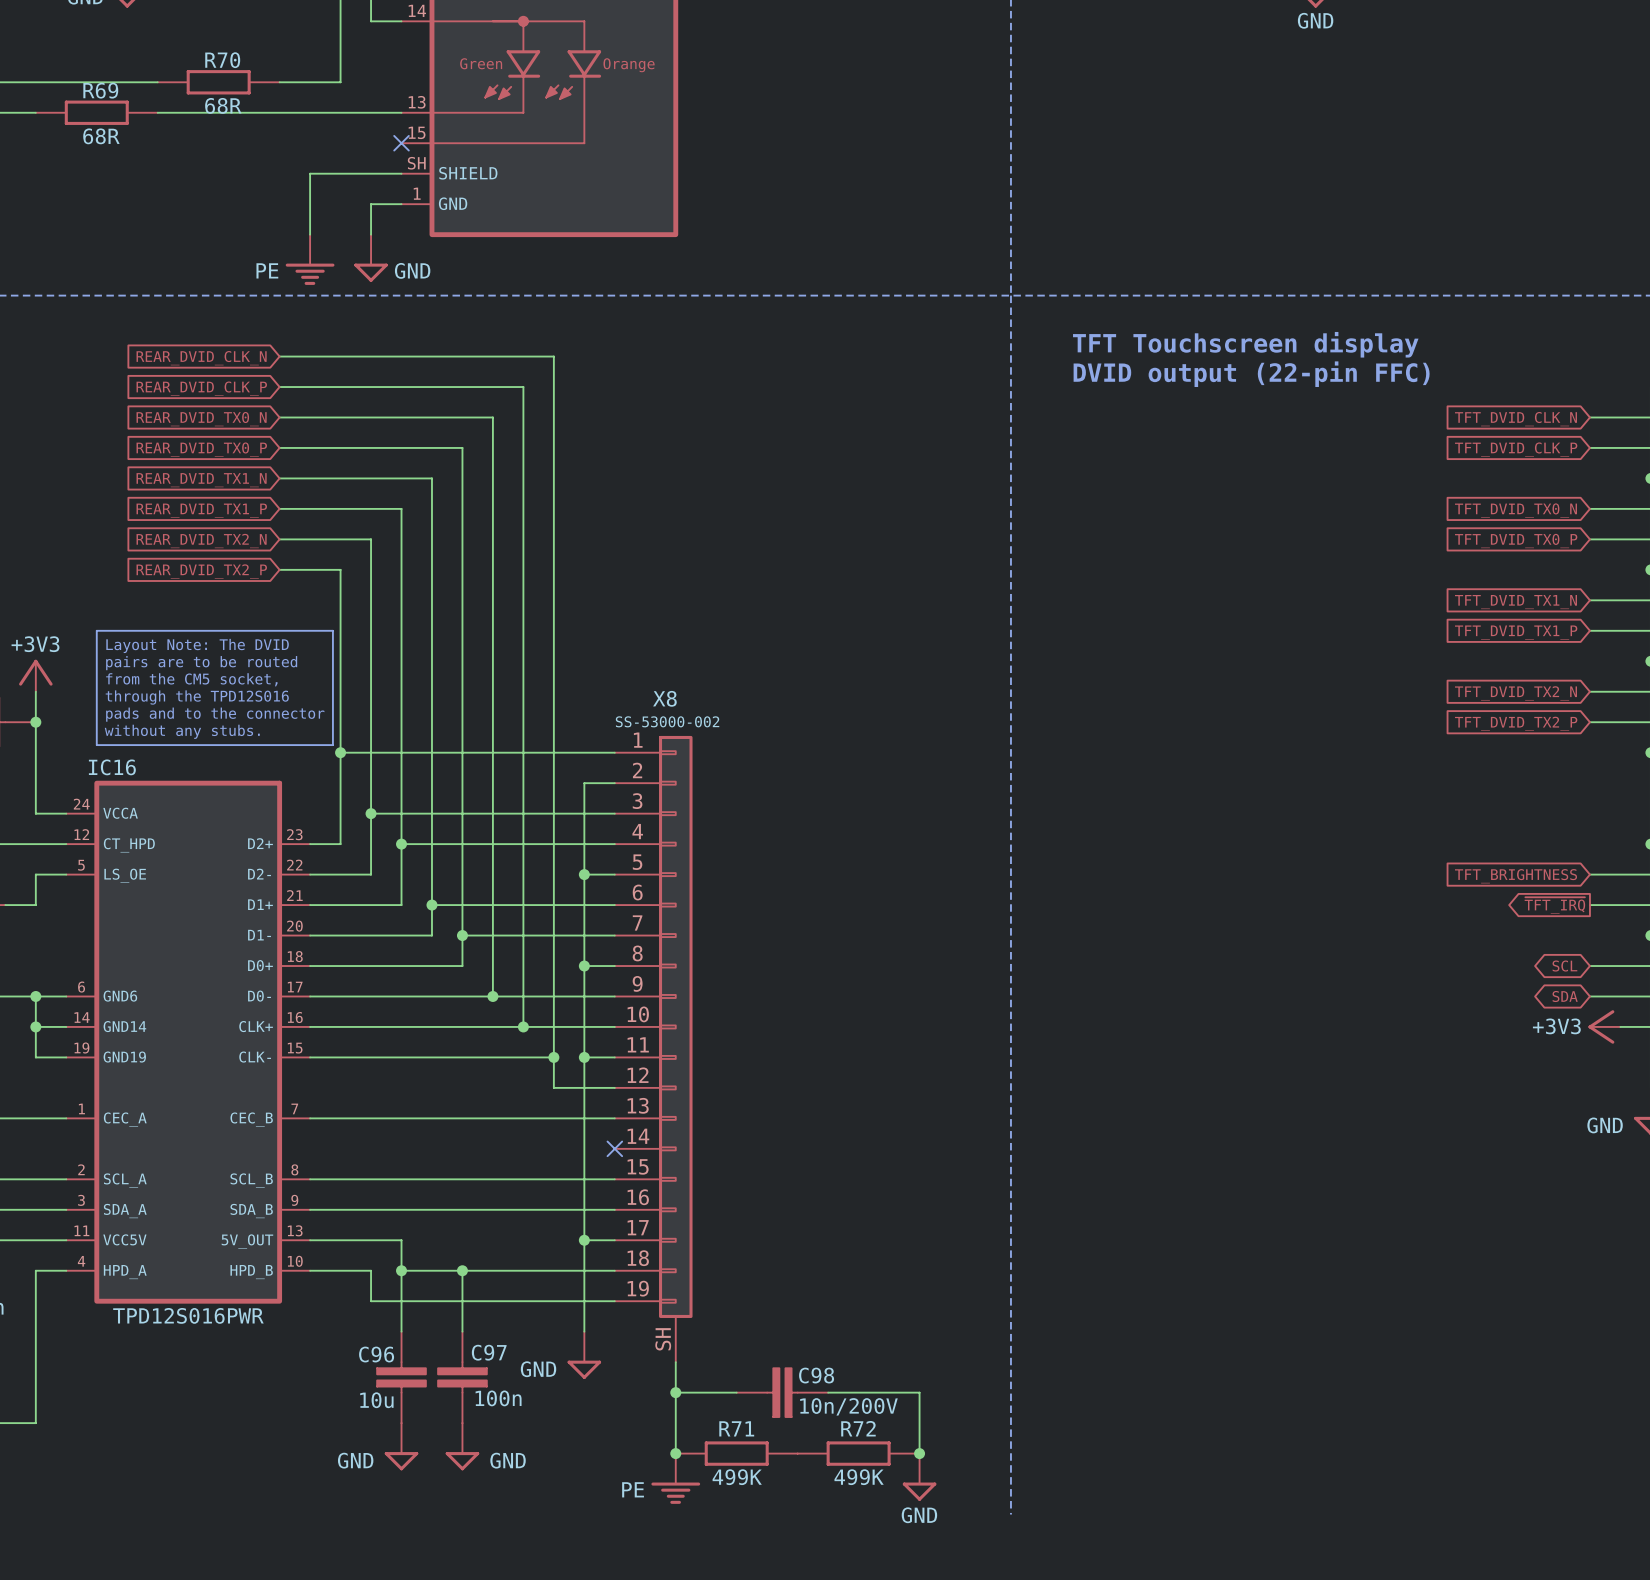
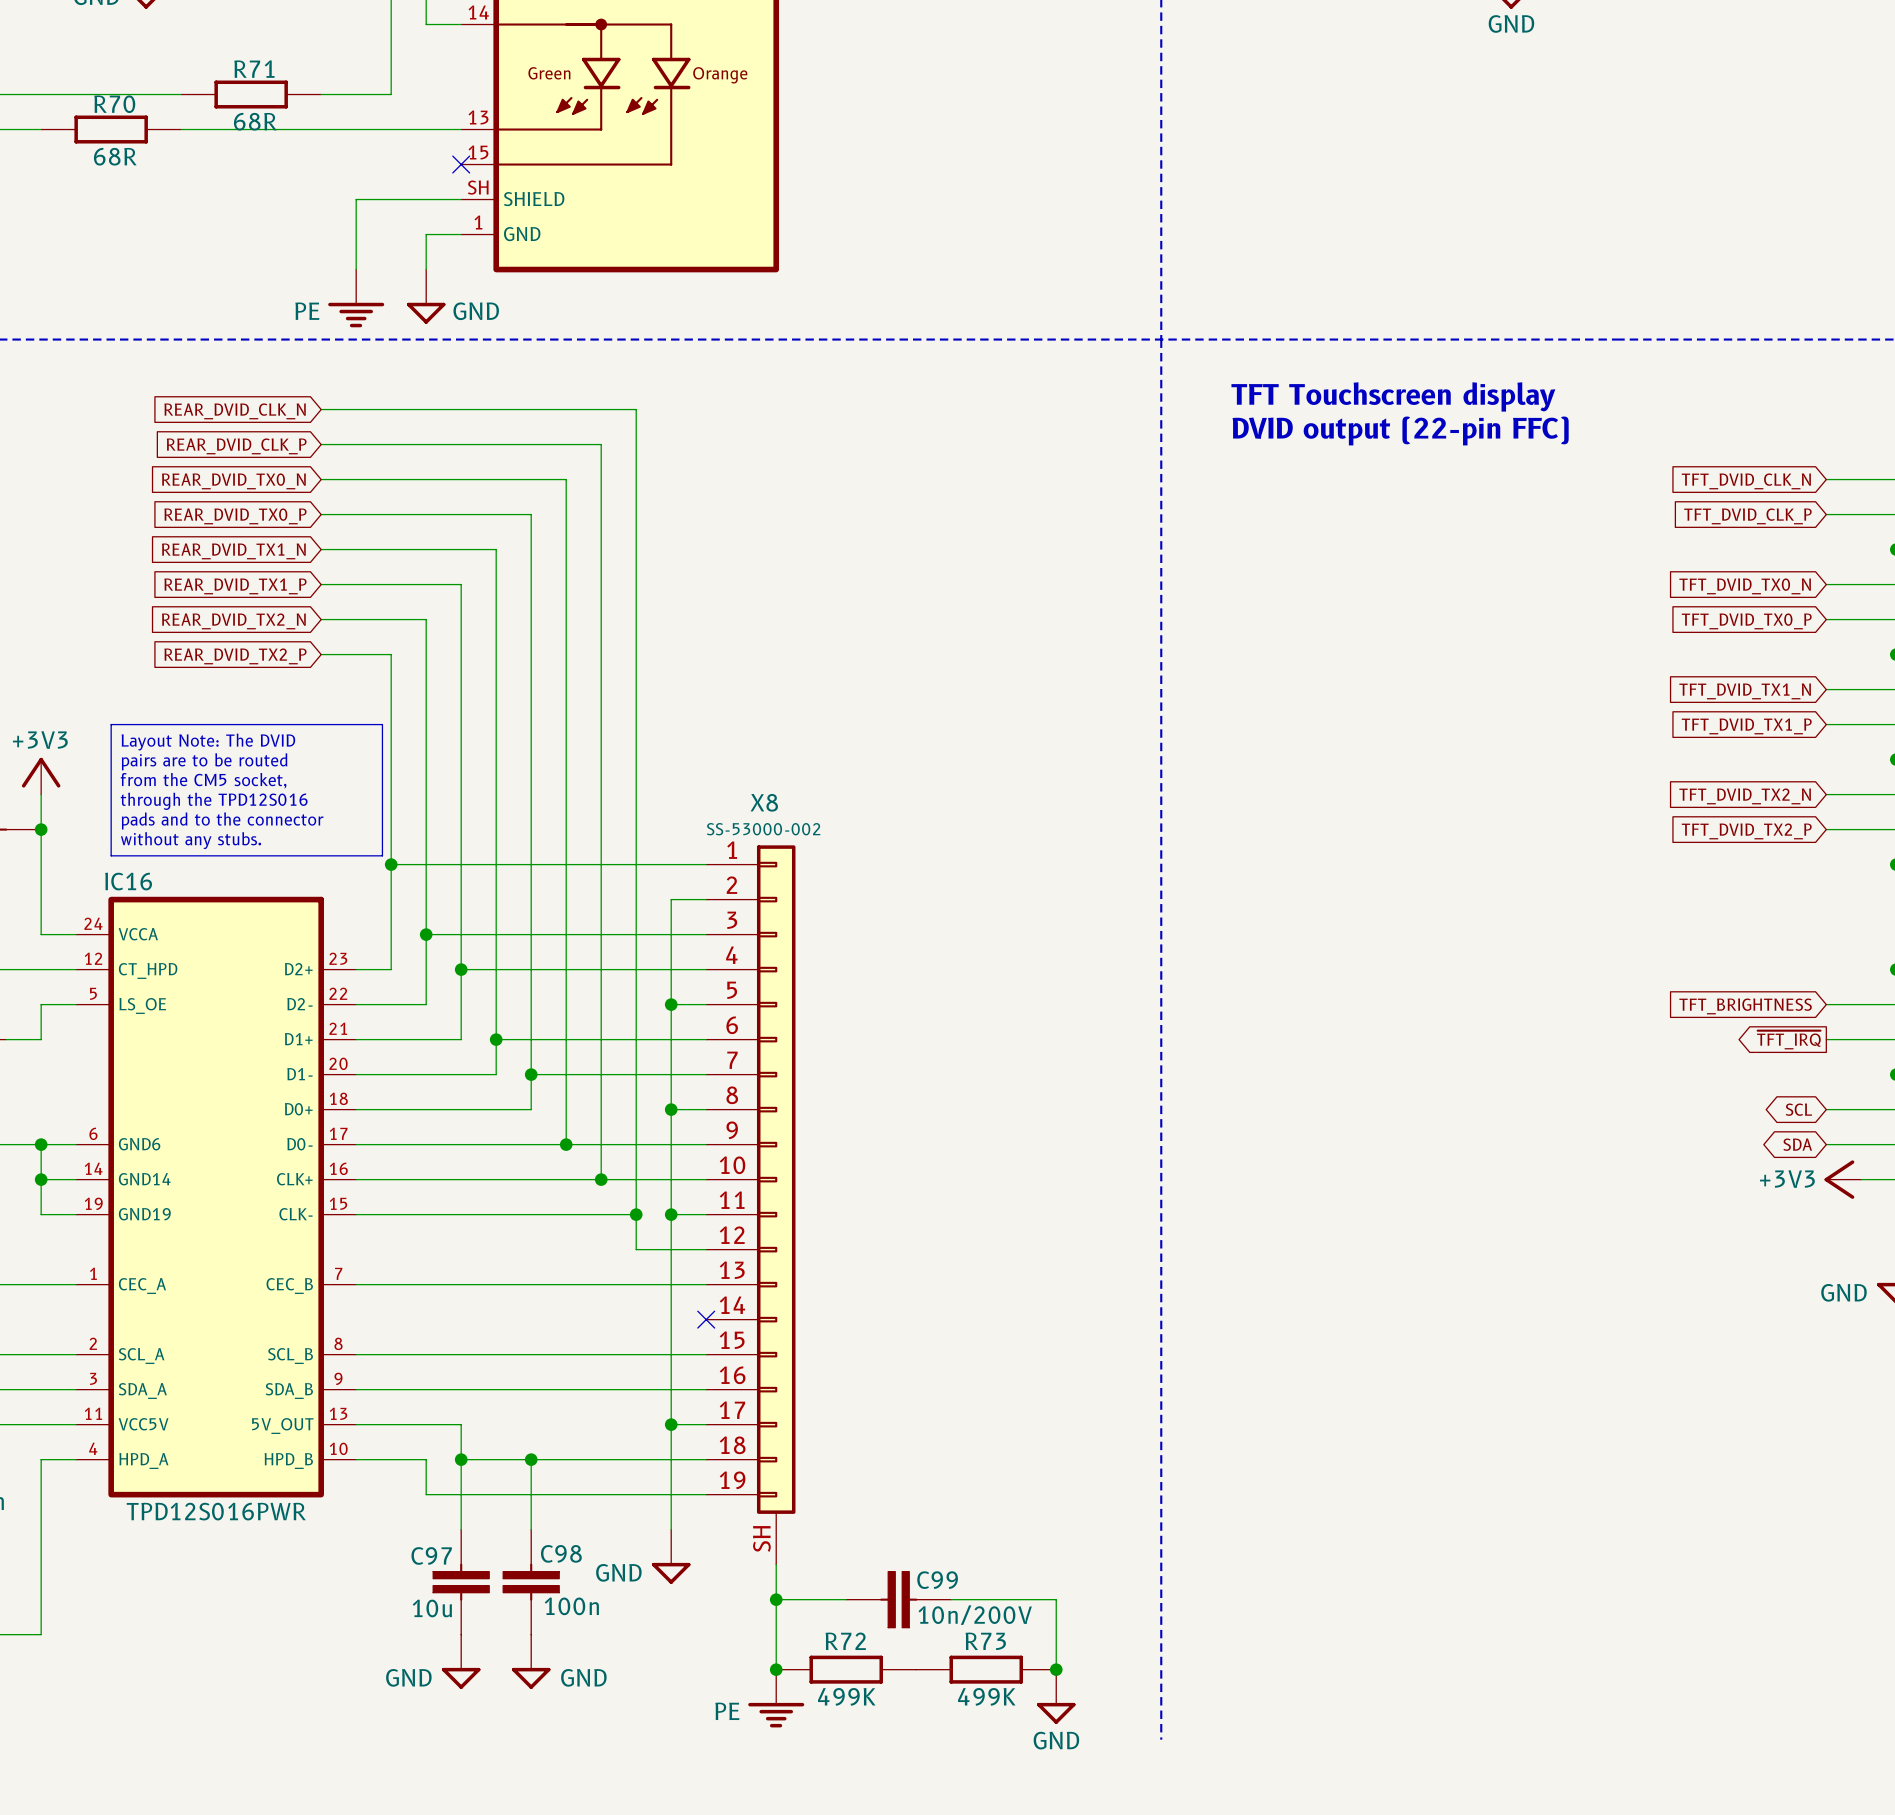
R70 name: R70 (222, 60) -> R71 (254, 69)
R69 name: R69 (100, 90) -> R70 (114, 104)
C97 name: C97 (489, 1352) -> C98 (561, 1553)
C96 name: C96 (376, 1354) -> C97 (431, 1555)
C98 name: C98 (816, 1375) -> C99 (937, 1580)
R71 name: R71 (736, 1428) -> R72 (845, 1641)
R72 name: R72 (858, 1428) -> R73 (985, 1641)

